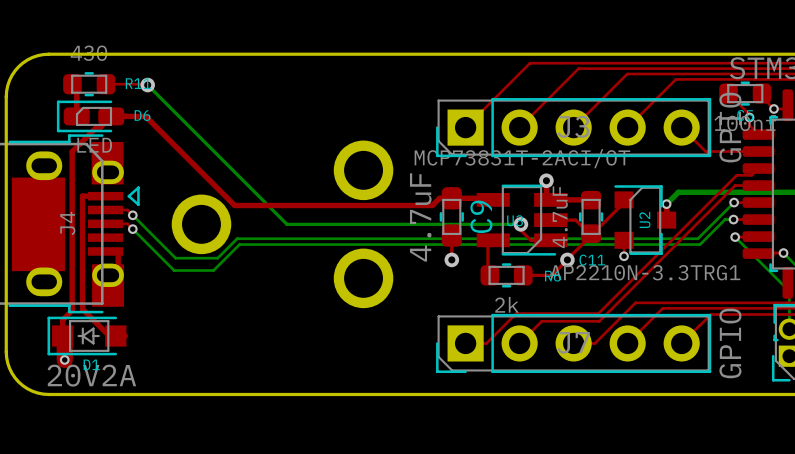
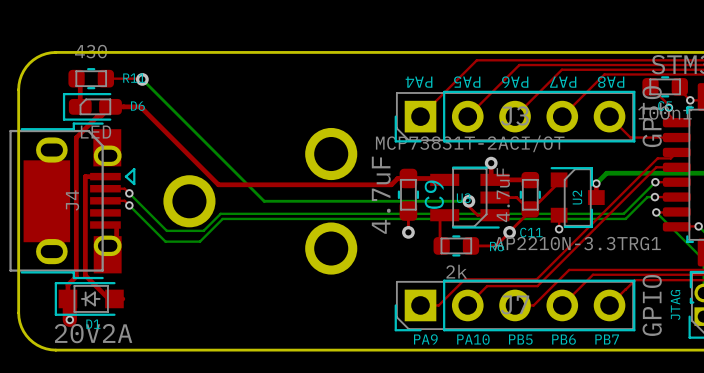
text: none -> PA8 PA7 PA6 PA5 PA4 (514, 82)
text: none -> JTAG (675, 305)
text: none -> PA9 PA10 PB5 PB6 PB7 (516, 339)

